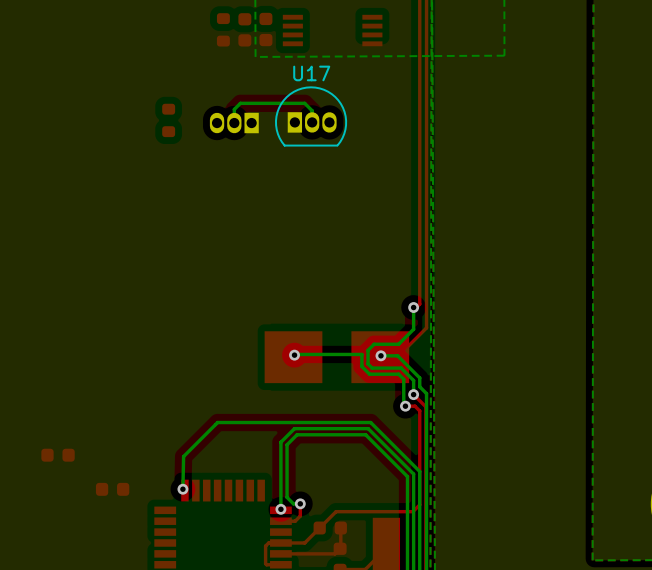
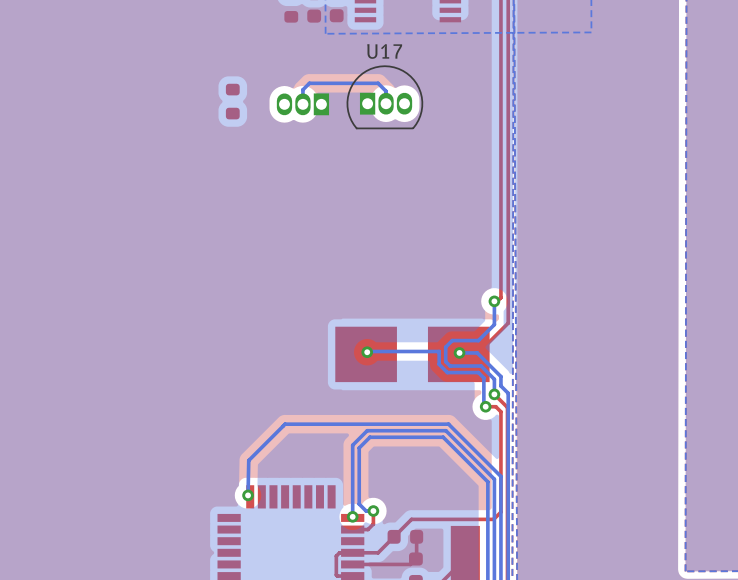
part: (58, 455) -> none
part: (112, 489) -> none

